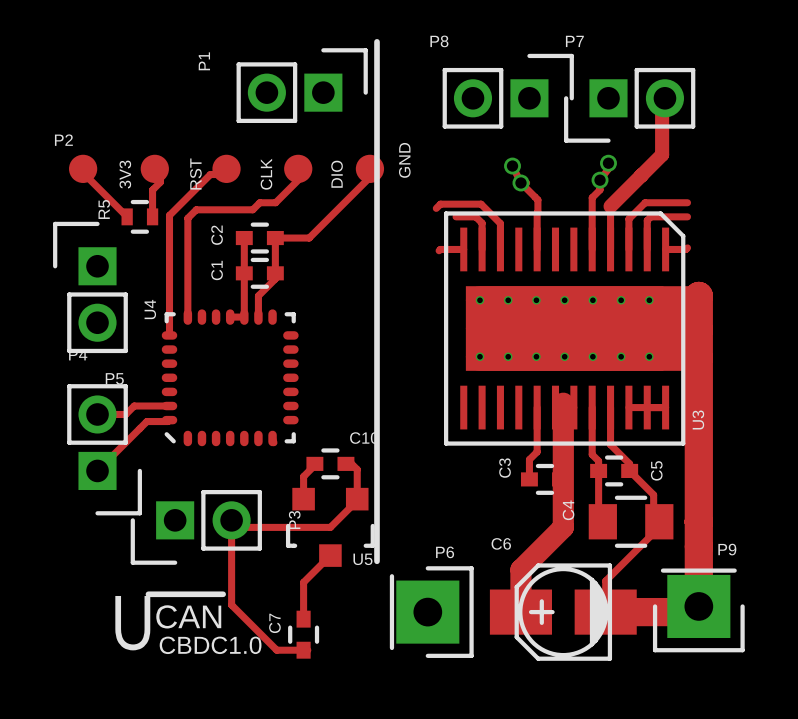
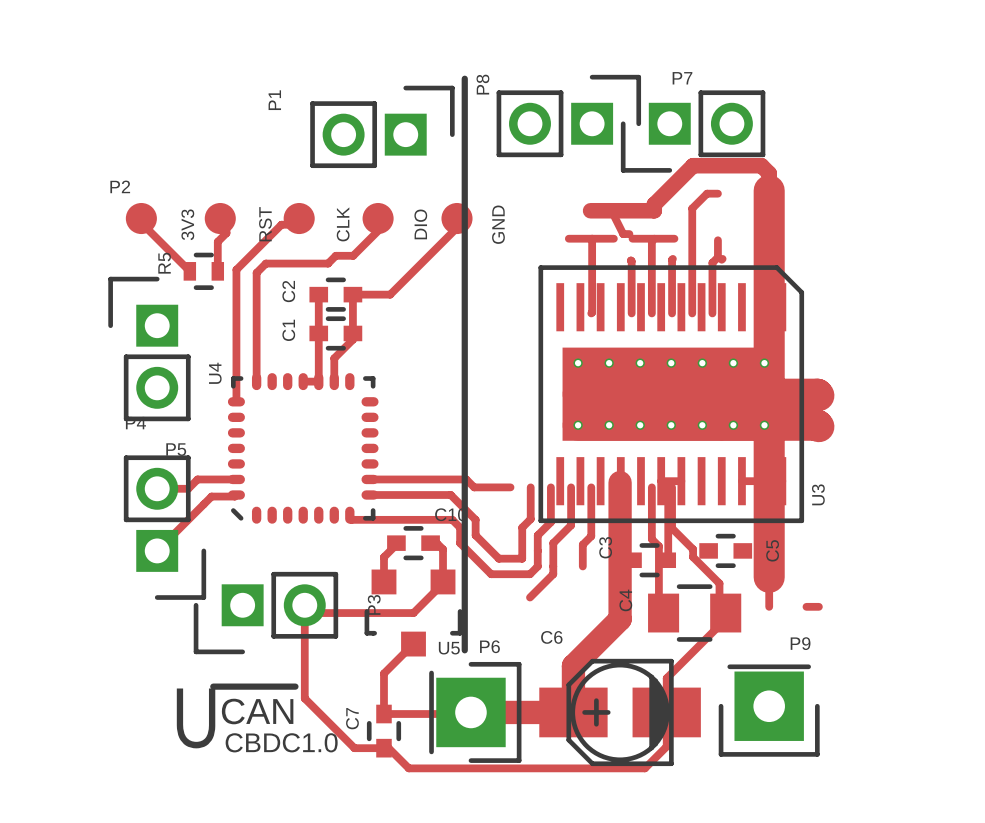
P8 name rotation: 0° (439, 41) -> 90° counterclockwise (482, 84)
P8 position: (508, 91) -> (568, 116)
track: (664, 98) (662, 101) (662, 154) (610, 206) (610, 249) -> none
P7 position: (629, 105) -> (693, 131)
track: none -> (717, 193) (707, 193) (692, 208) (692, 313)
text position: GND (404, 160) -> GND (498, 224)
track: (608, 163) (608, 168) (600, 180) (600, 189) (592, 197) (592, 249) -> none
via: (608, 163) -> none
via: (512, 166) -> none
via: (600, 180) -> none
track: (520, 182) (537, 199) (537, 249) -> none
via: (520, 182) -> none
track: none -> (568, 238) (613, 238)
track: none -> (592, 238) (591, 313)
track: none -> (632, 238) (674, 238)
track: none -> (654, 238) (651, 241) (651, 313)
track: none -> (717, 240) (717, 257) (712, 262) (712, 313)
track: (687, 202) (645, 202) (628, 219) (628, 249) -> none
track: none -> (672, 258) (672, 313)
track: none -> (630, 260) (631, 313)
track: (436, 208) (440, 204) (481, 204) (500, 223) (500, 249) -> none
track: (456, 216) (475, 216) (482, 223) (482, 249) -> none
track: (687, 216) (650, 216) (647, 220) (647, 249) -> none
track: (687, 247) (665, 249) -> none
track: (463, 249) (439, 250) -> none
track: (649, 300) (479, 300) (694, 300) (698, 295) (698, 606) (693, 612) (605, 612) (605, 581) (659, 527) (659, 521) -> none
track: (563, 403) (563, 527) (520, 569) (520, 612) -> none
track: none -> (370, 479) (466, 479) (474, 487) (510, 487)
track: (537, 407) (537, 451) (529, 459) (529, 479) -> (591, 487) (591, 536) (582, 544) (582, 566)
track: (592, 407) (592, 454) (598, 461) (598, 514) -> (651, 487) (651, 539) (658, 546) (658, 605)
track: (610, 407) (610, 444) (629, 463) (629, 470) (653, 494) -> (590, 210) (654, 210) (654, 204) (693, 165) (761, 165) (769, 173) (769, 577)
track: none -> (620, 482) (620, 619) (573, 665) (573, 712) (477, 712) (470, 718) (466, 714) (383, 714)
track: none -> (530, 487) (530, 519) (522, 527) (522, 558) (498, 558) (475, 535) (475, 519) (450, 495) (370, 495)
track: none -> (550, 487) (550, 522) (537, 535) (537, 566) (530, 574) (491, 574) (460, 543) (460, 527) (452, 519) (351, 519)
track: none -> (571, 487) (571, 525) (553, 543) (553, 574) (530, 597)
track: none -> (672, 487) (672, 528) (693, 549) (693, 557) (719, 583) (719, 613)
C4 position: (631, 521) -> (694, 613)
track: none -> (725, 613) (725, 619) (666, 678) (666, 746) (644, 768) (408, 768) (388, 748)
P9 position: (698, 610) -> (769, 710)
P6 position: (431, 612) -> (475, 712)
C6 position: (563, 612) -> (620, 712)

